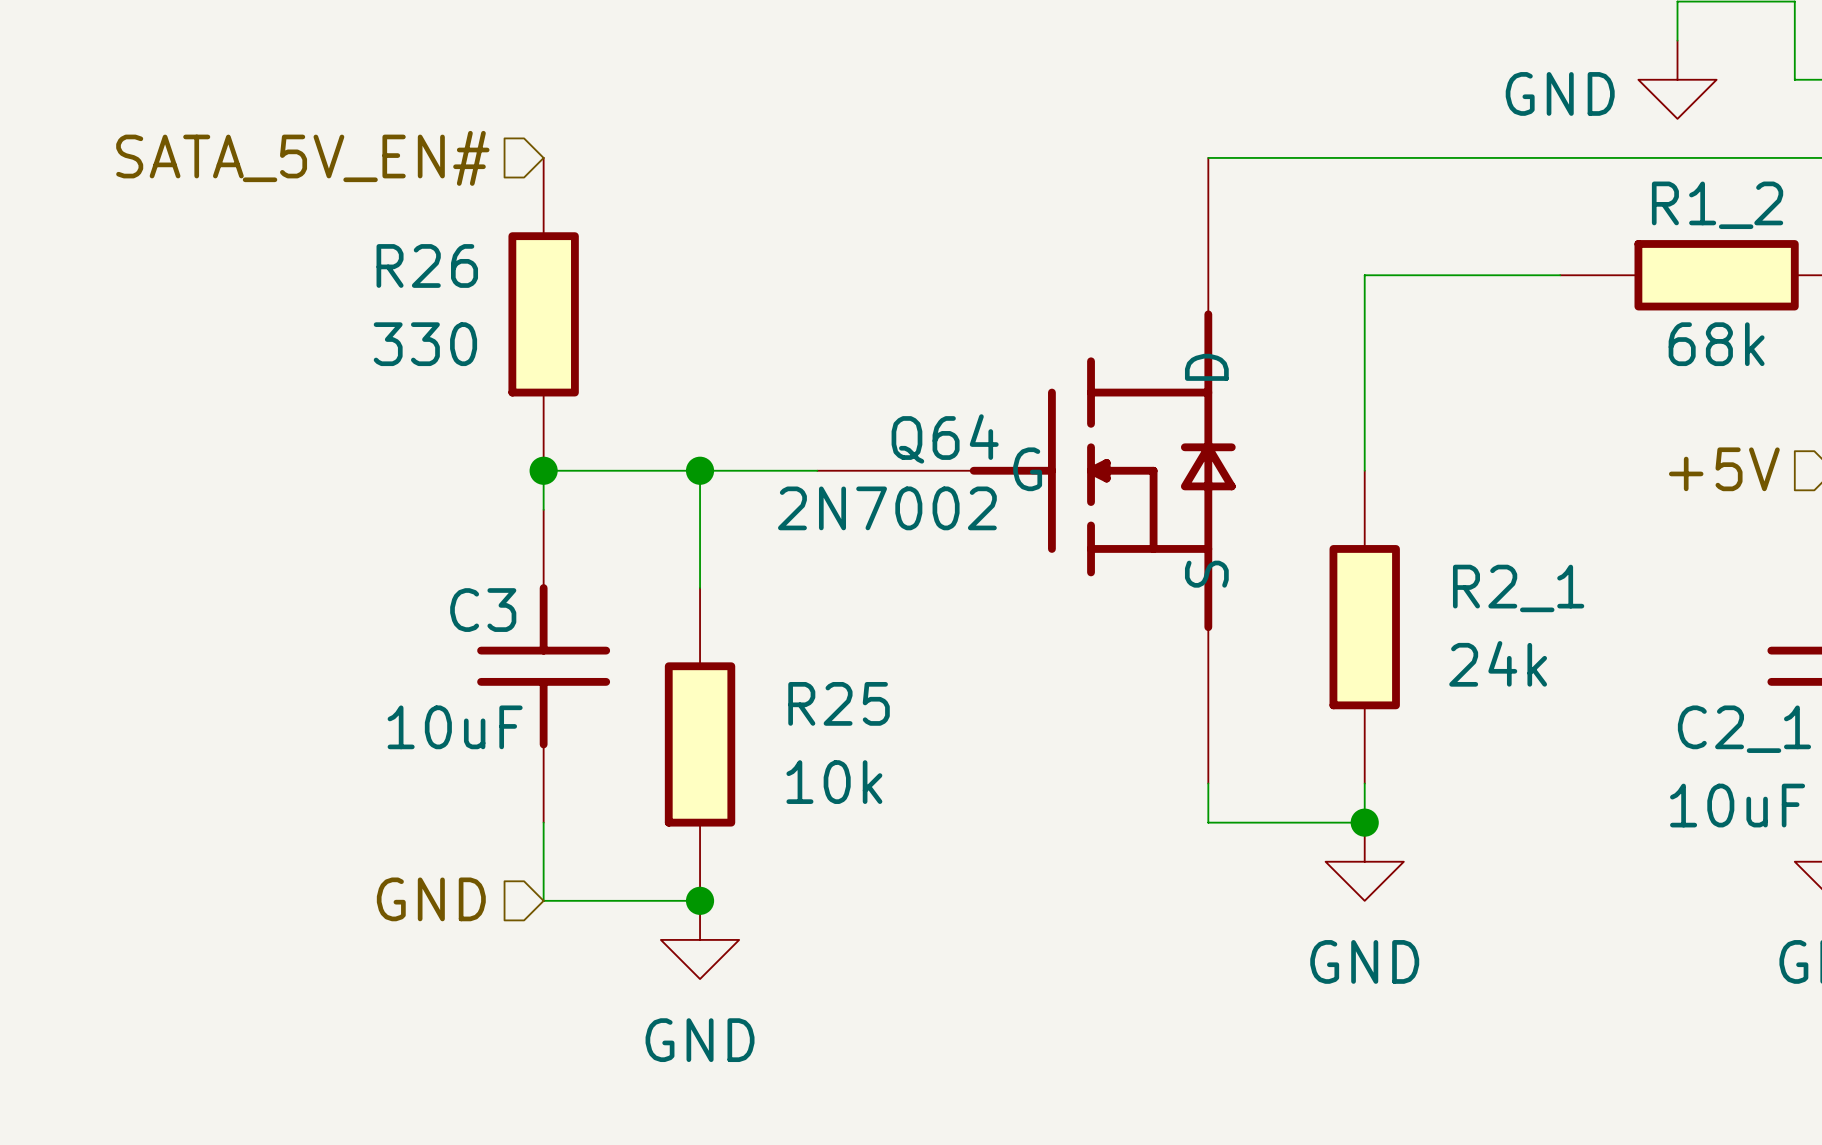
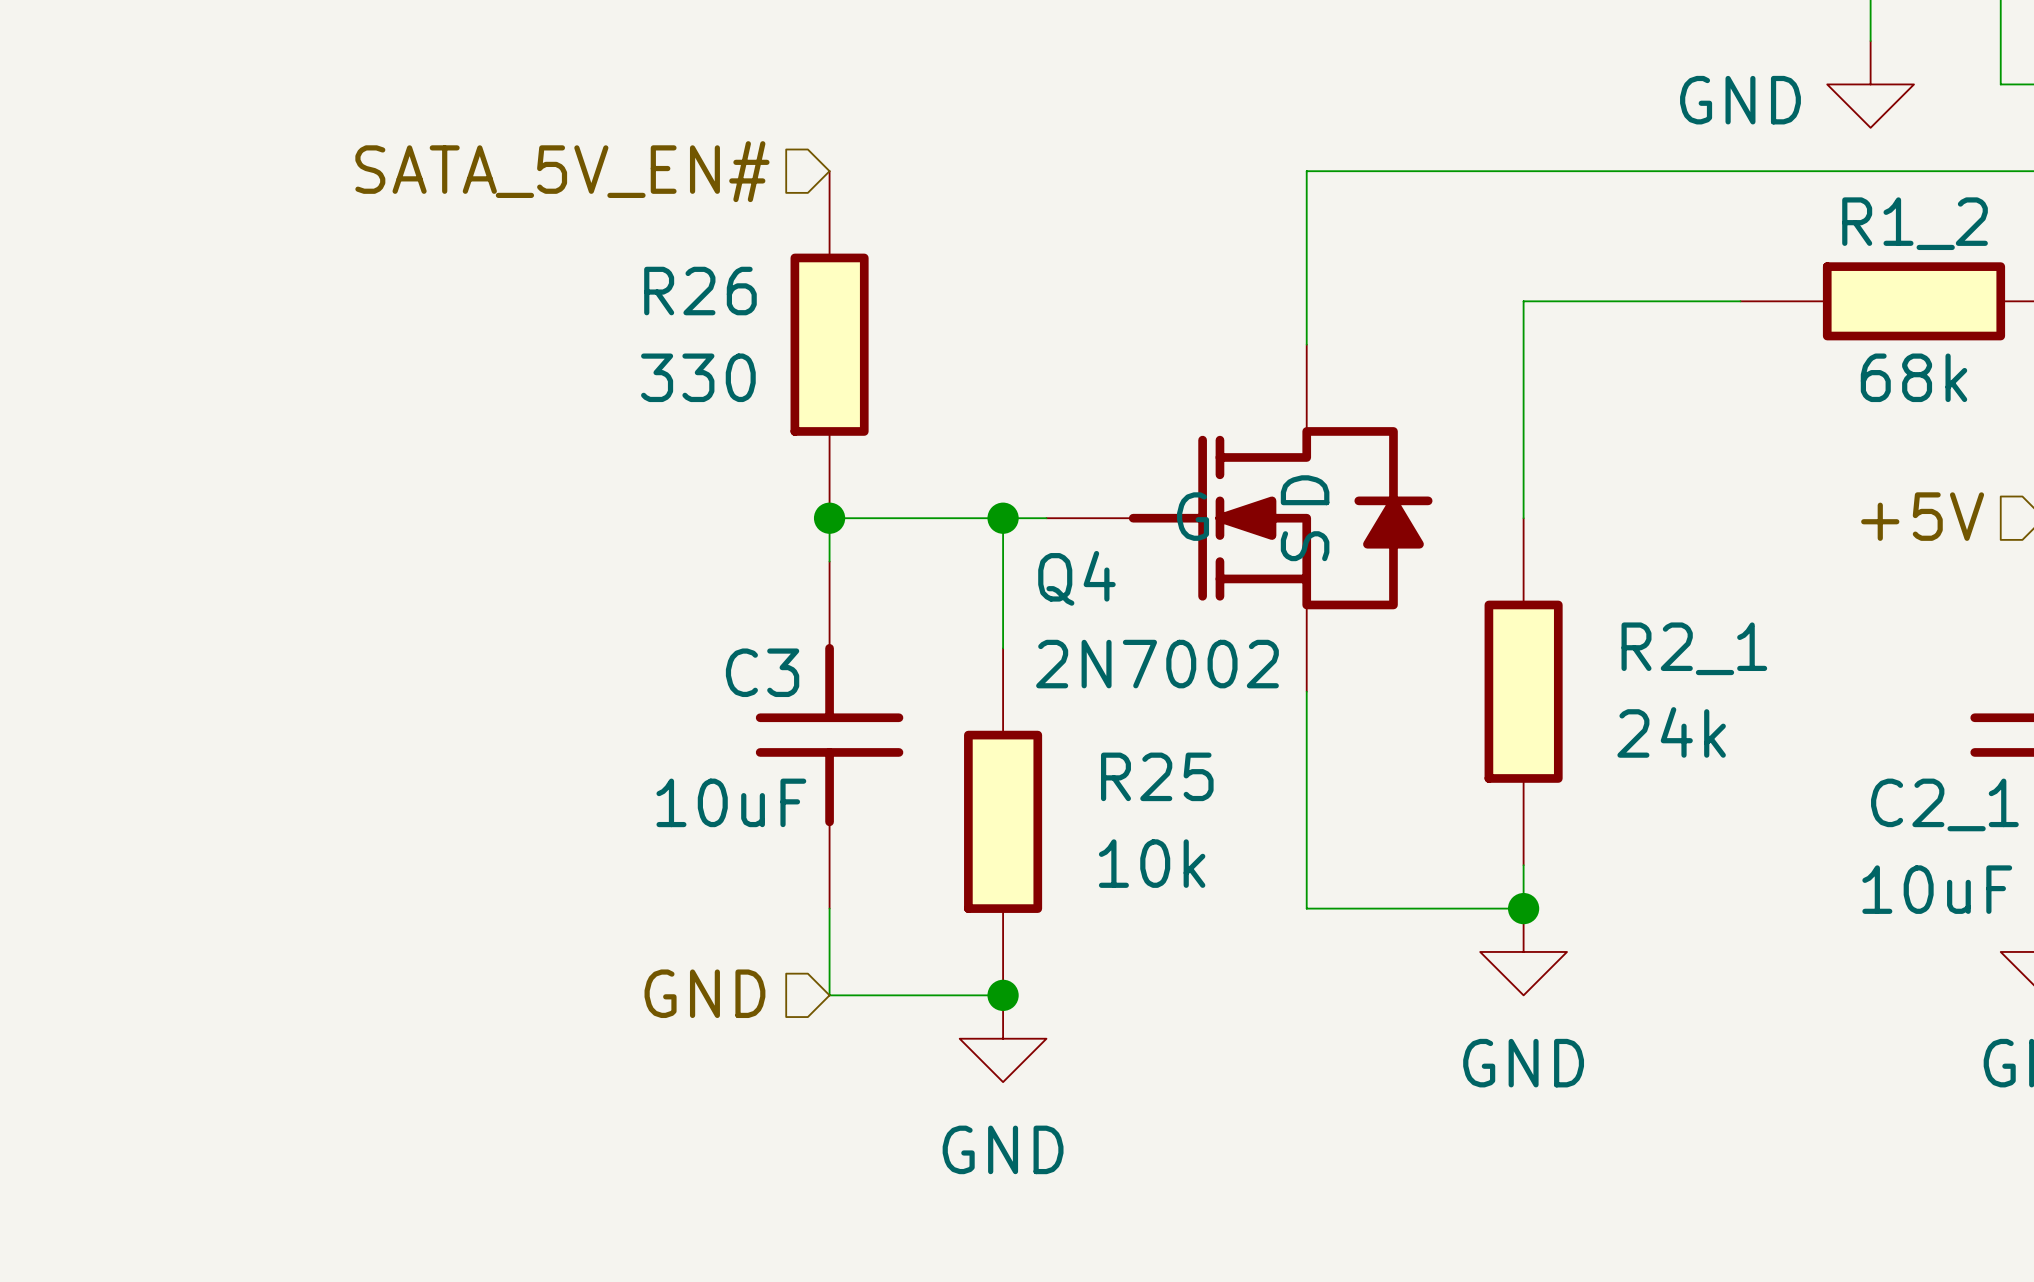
wire: none -> (1350, 171) (1306, 171) (1306, 344)
hierarchical label position: SATA_5V_EN# (302, 158) -> SATA_5V_EN# (562, 171)
R26 position: (543, 314) -> (829, 344)
junction: (543, 470) -> none
wire: (700, 470) (700, 588) -> (1003, 518) (1003, 648)
junction position: (700, 470) -> (829, 518)
wire: (739, 470) (543, 470) (543, 509) -> (829, 518) (829, 561)
junction: none -> (1003, 518)
Q64: 2N7002 (1026, 470) -> none
Q4: none -> 2N7002 (1239, 518)
C3 position: (543, 666) -> (829, 735)
R25 position: (700, 744) -> (1003, 821)
wire: (1208, 783) (1208, 822) -> (1306, 691) (1306, 908) (1350, 908)
wire: (543, 822) (543, 900) (700, 900) -> (829, 908) (829, 995) (1003, 995)
hierarchical label position: GND (431, 899) -> GND (704, 993)
junction: (700, 900) -> none
junction: none -> (1003, 995)
power symbol position: GND (700, 939) -> GND (1003, 1038)

